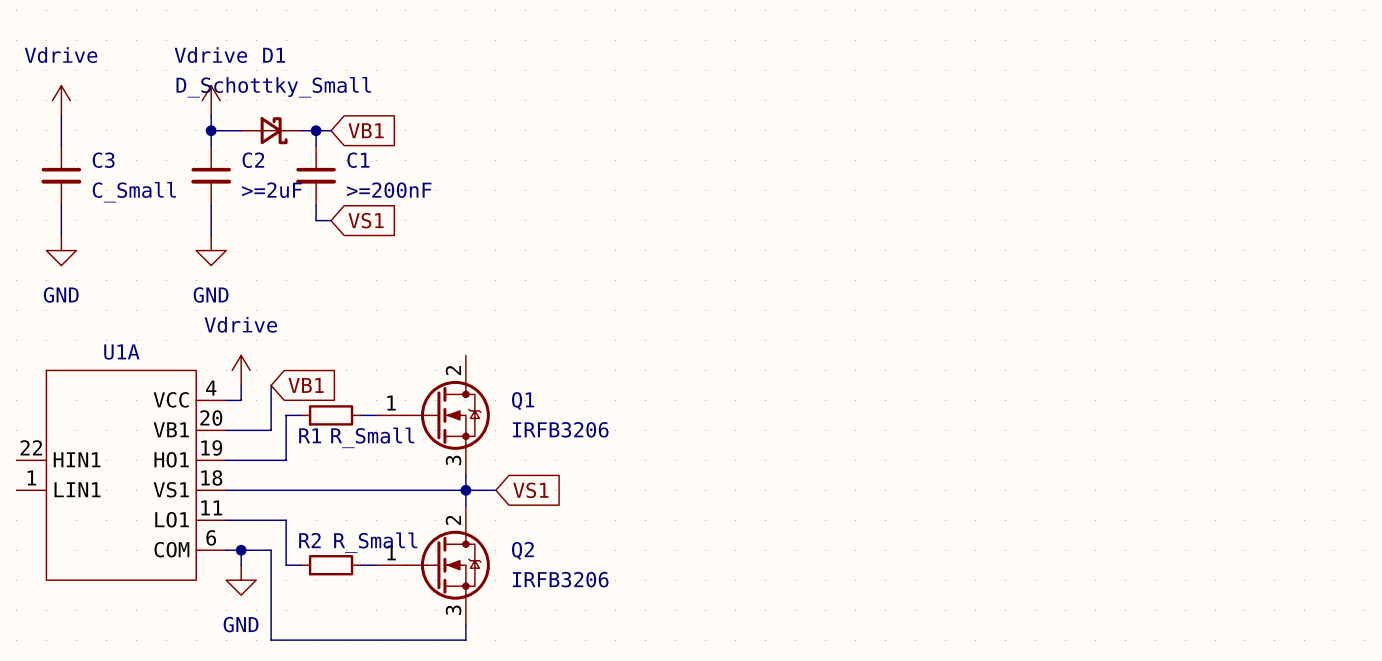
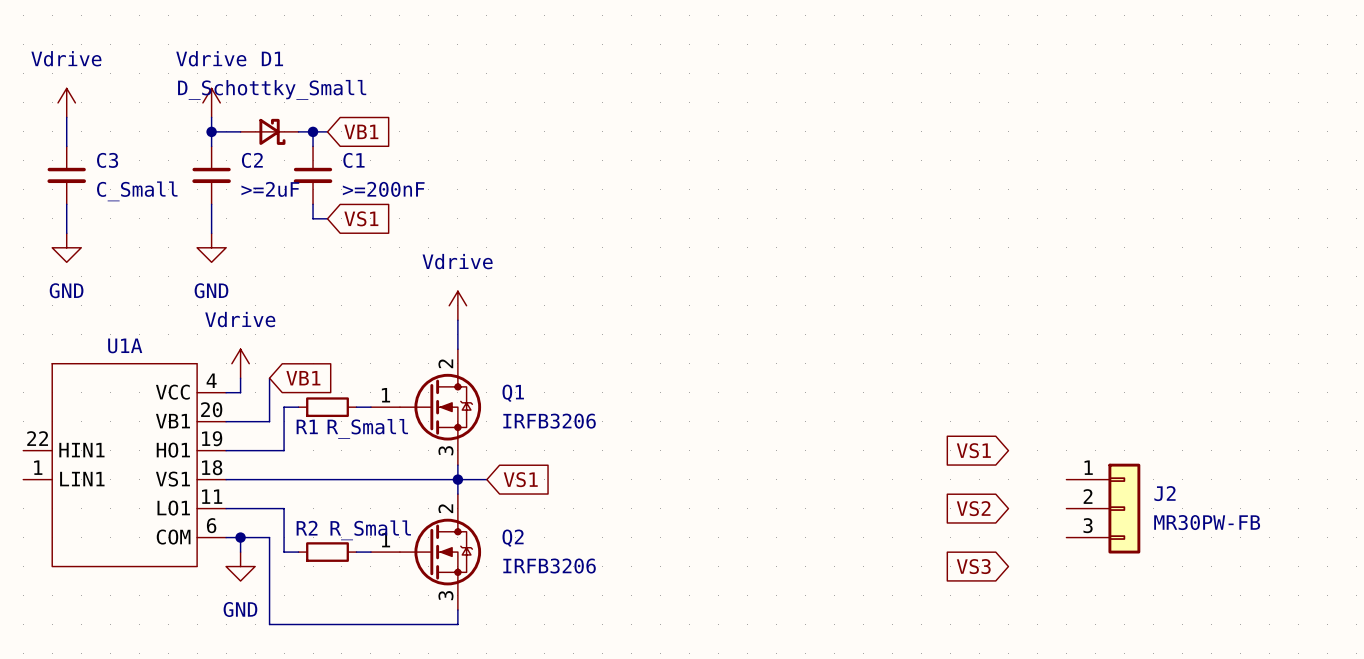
power symbol: none -> Vdrive (457, 305)
wire: none -> (457, 320) (457, 349)
global label: none -> VS1 (973, 450)
global label: none -> VS2 (973, 508)
J2: none -> MR30PW-FB (1103, 508)
global label: none -> VS3 (973, 566)

